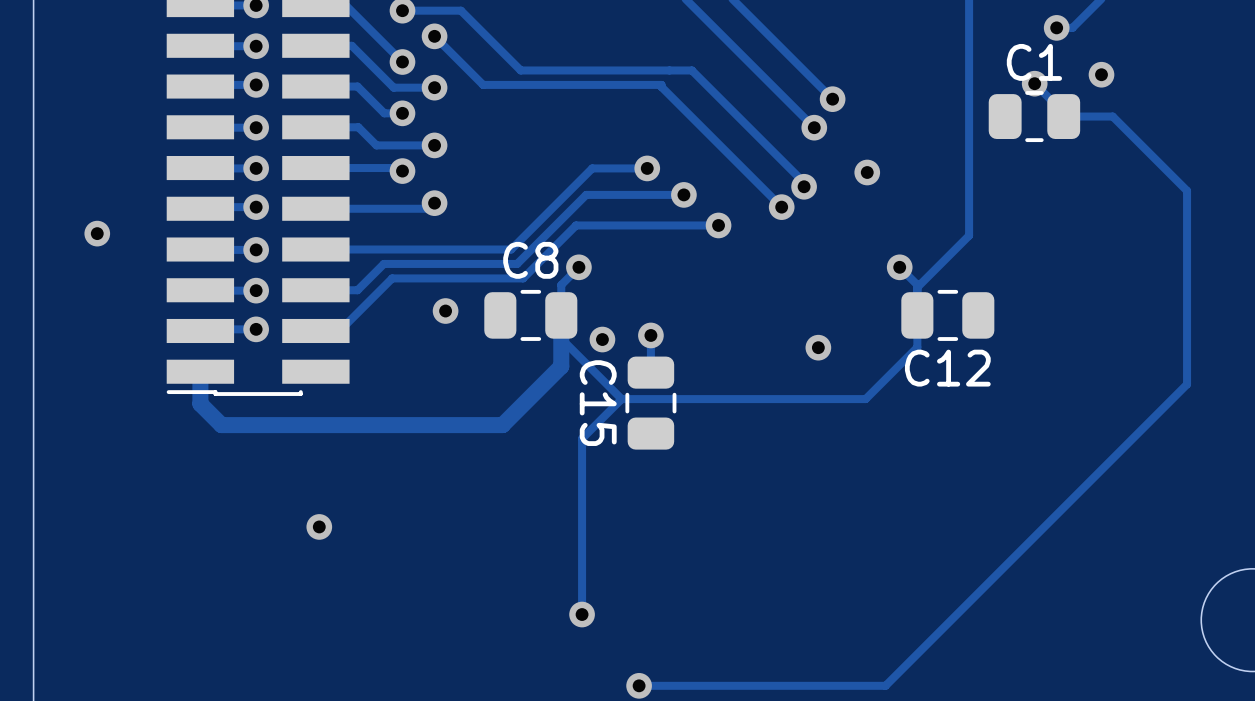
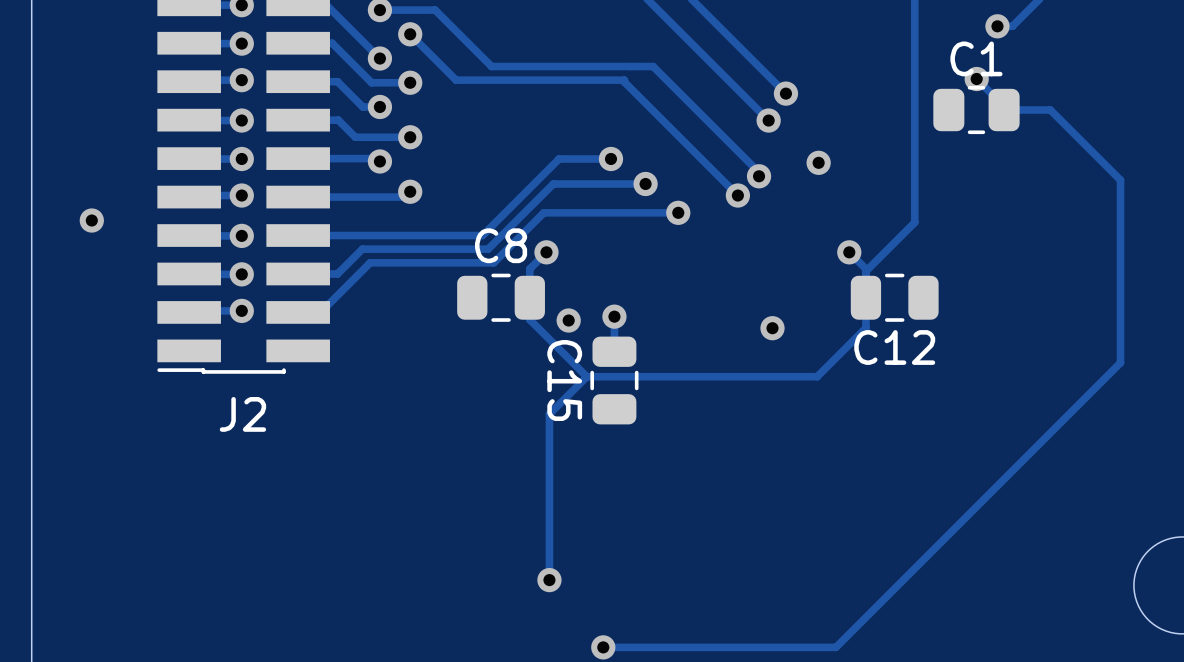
via: (1101, 74) -> none
via: (445, 311) -> none
track: (561, 315) (561, 366) (502, 425) (221, 425) (200, 403) (200, 371) -> none
J2 name: none -> J2 (242, 414)
via: (319, 526) -> none

